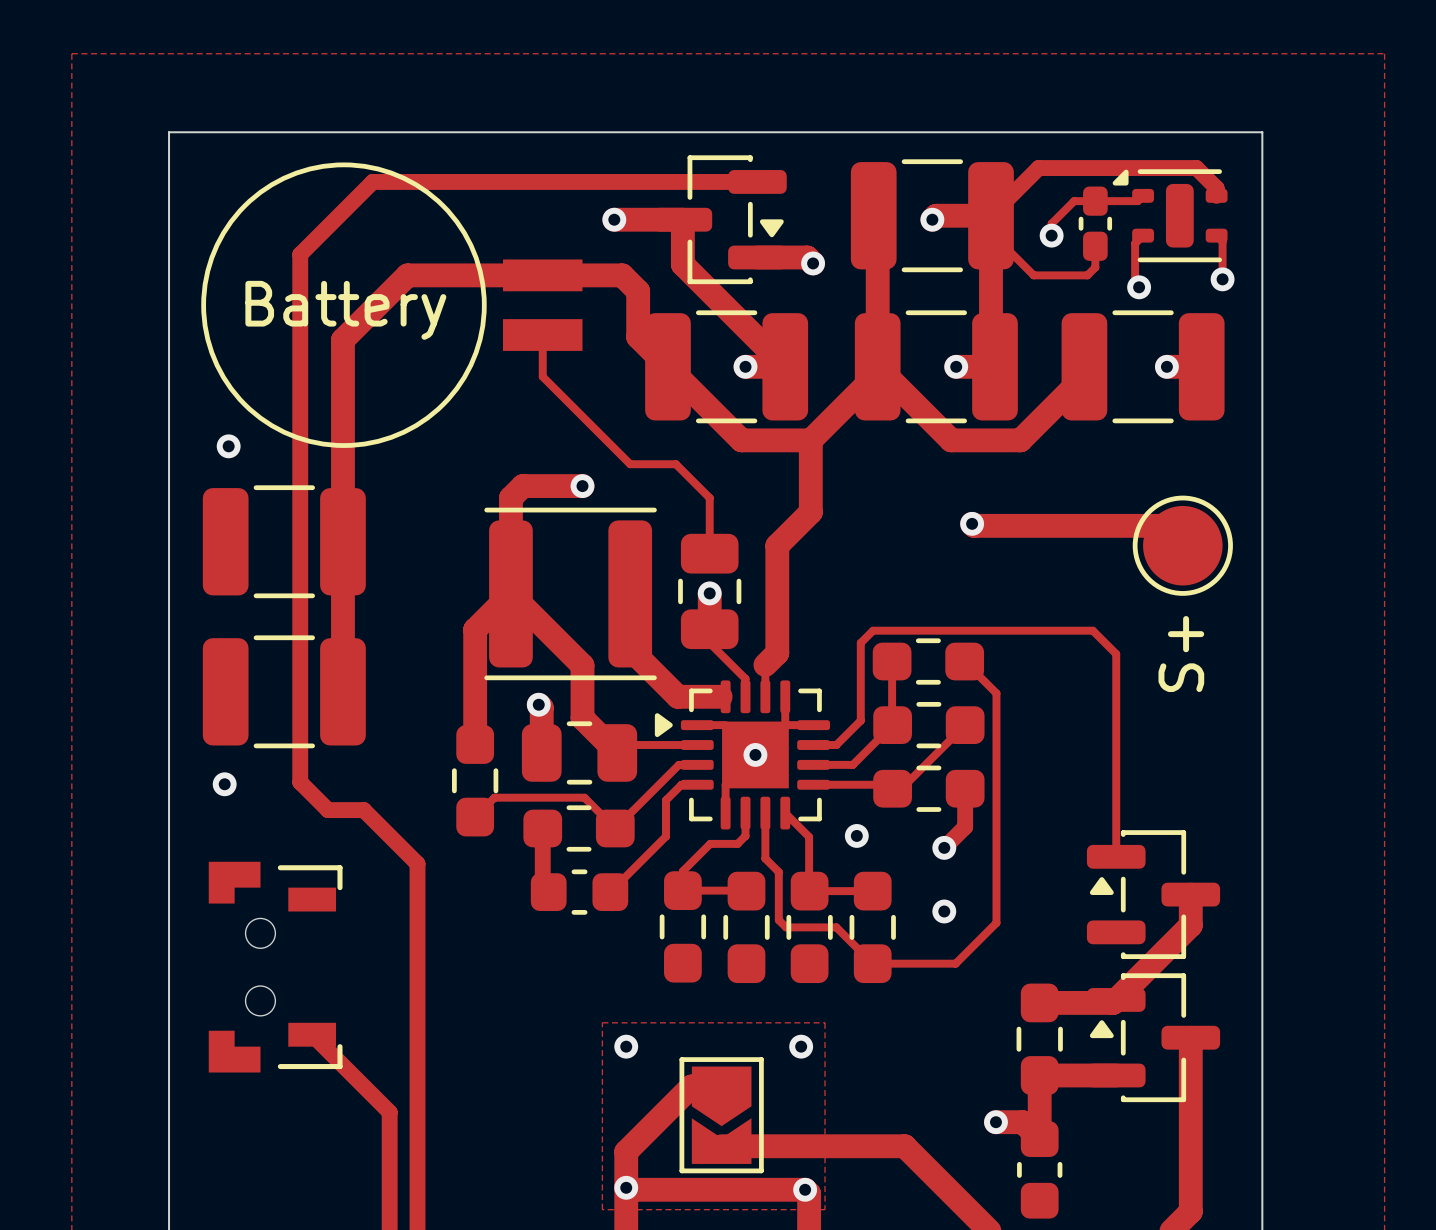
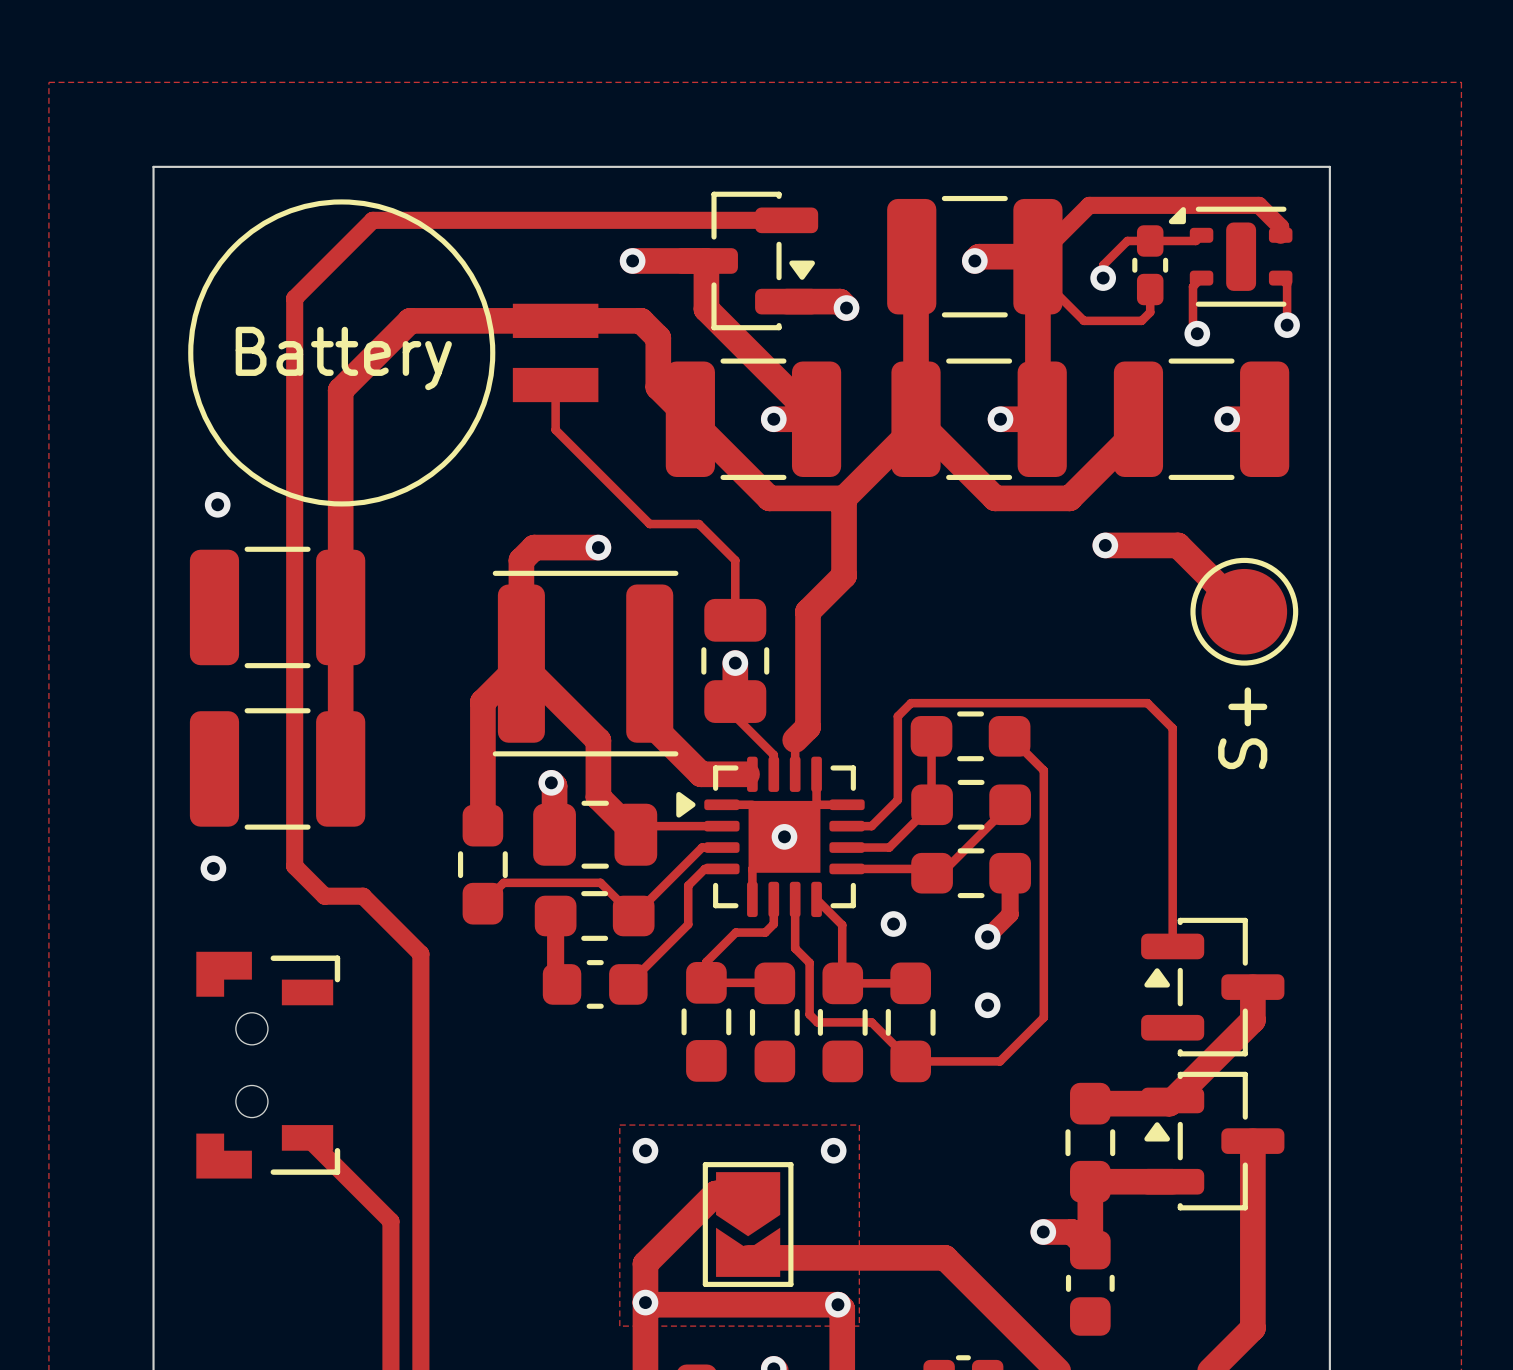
track: (972, 523) (974, 525) (1162, 525) -> (1105, 545) (1178, 545) (1222, 590)
via position: (972, 523) -> (1105, 545)

